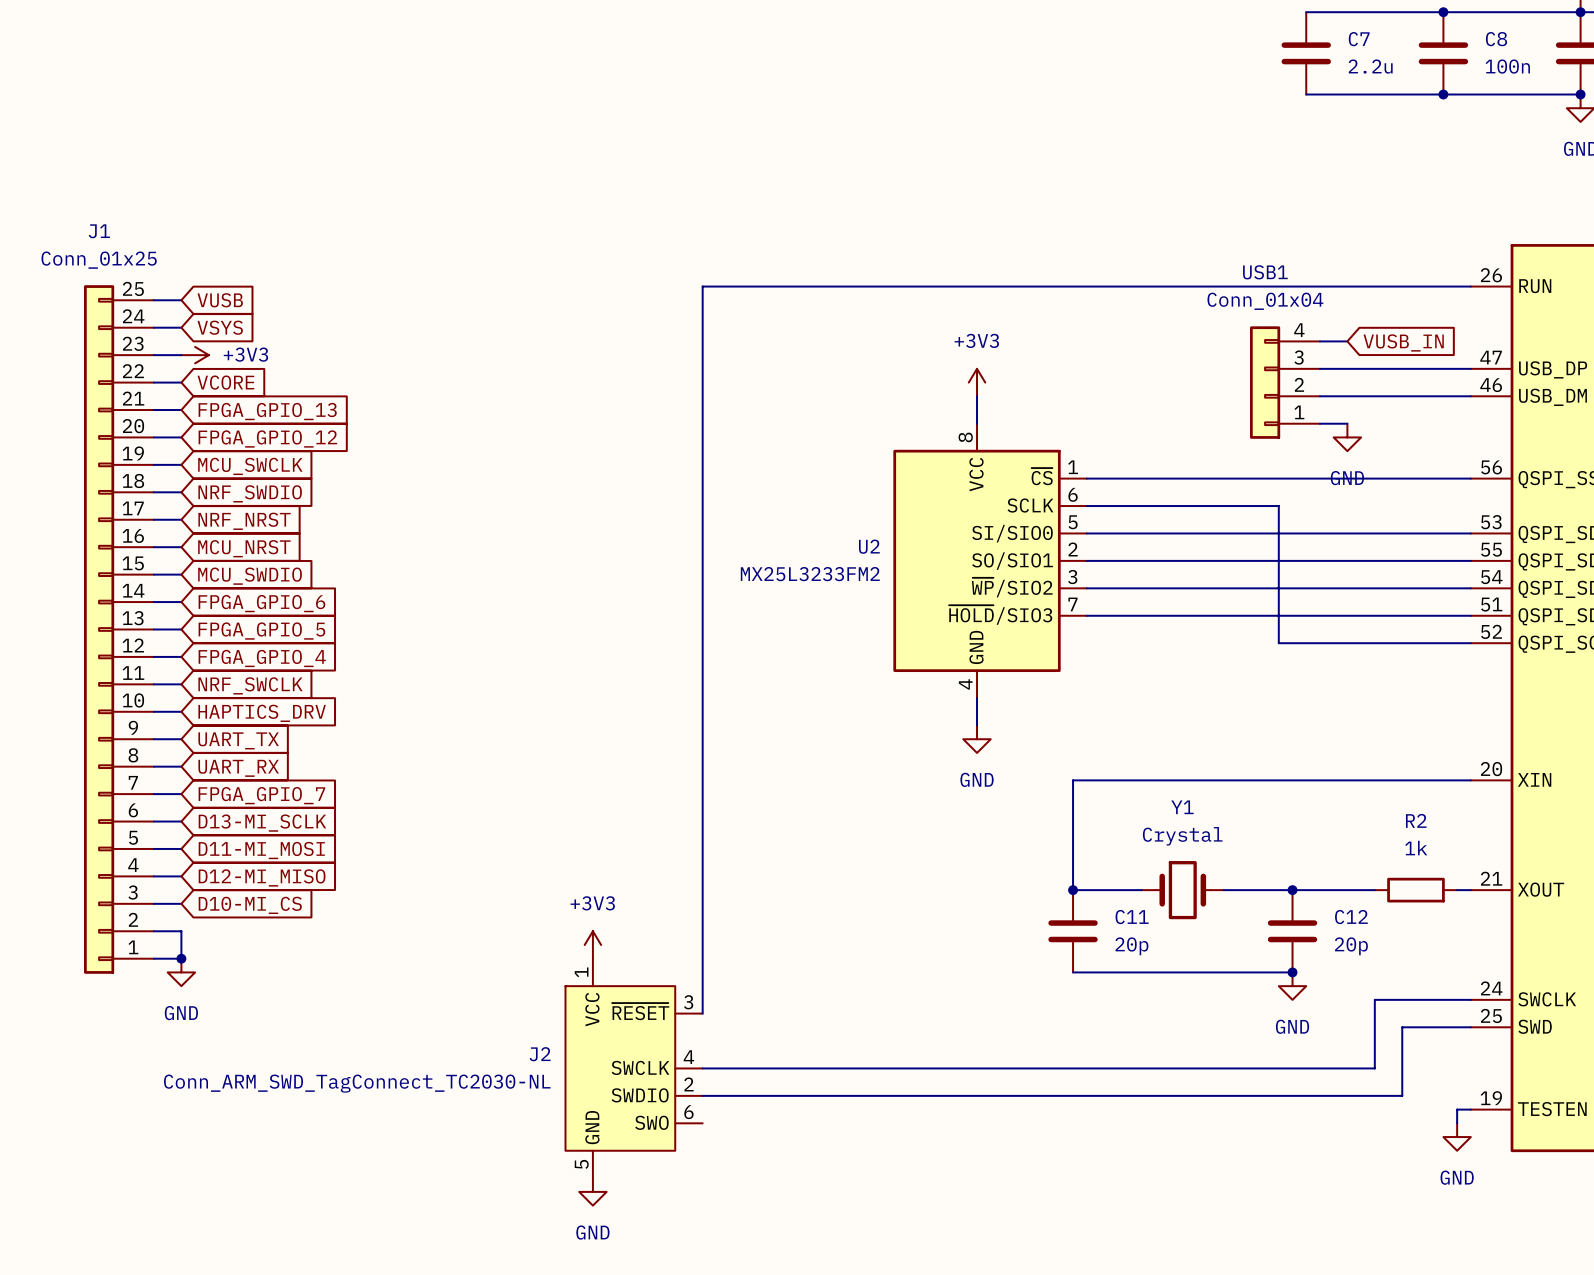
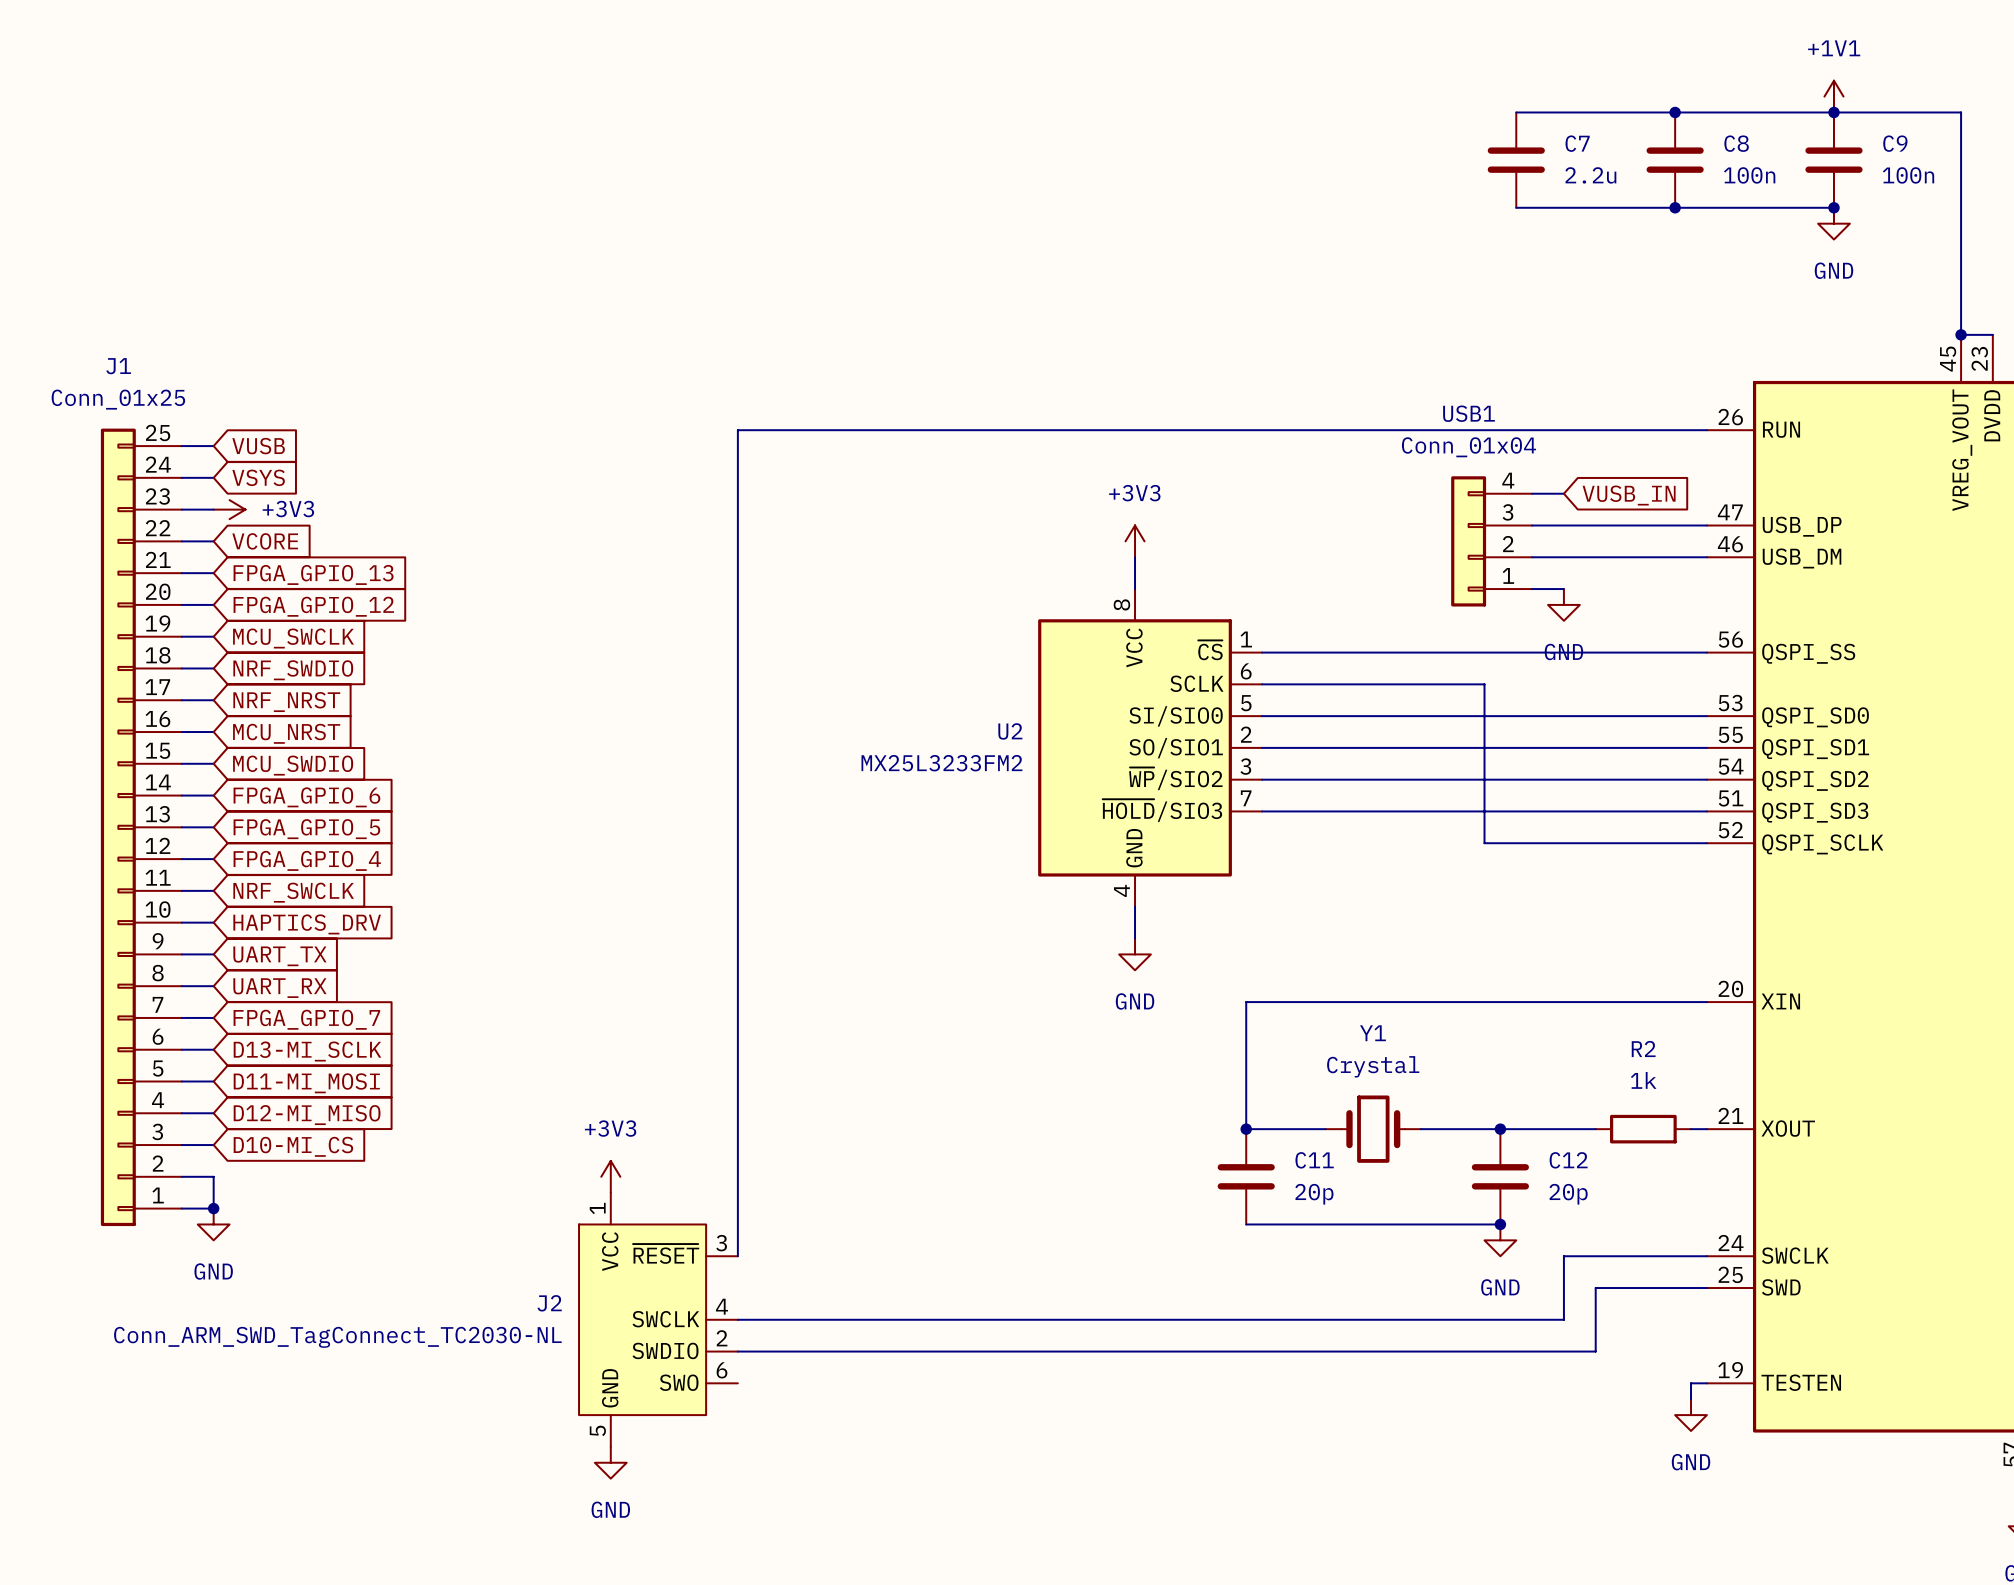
wire: (702, 286) (702, 1013) -> (817, 430) (737, 430) (737, 1256)
power symbol position: +3V3 (592, 944) -> +3V3 (610, 1176)
wire: (1374, 999) (1374, 1027) -> (1627, 1288) (1595, 1288)
wire: none -> (1595, 1256) (1563, 1256) (1563, 1319) (737, 1319)
wire: (1402, 1027) (1402, 1095) (702, 1095) -> none
J2 position: (634, 1068) -> (658, 1319)
wire: (702, 1068) (1374, 1068) -> (737, 1351) (1595, 1351) (1595, 1335)
power symbol position: GND (592, 1191) -> GND (610, 1462)

